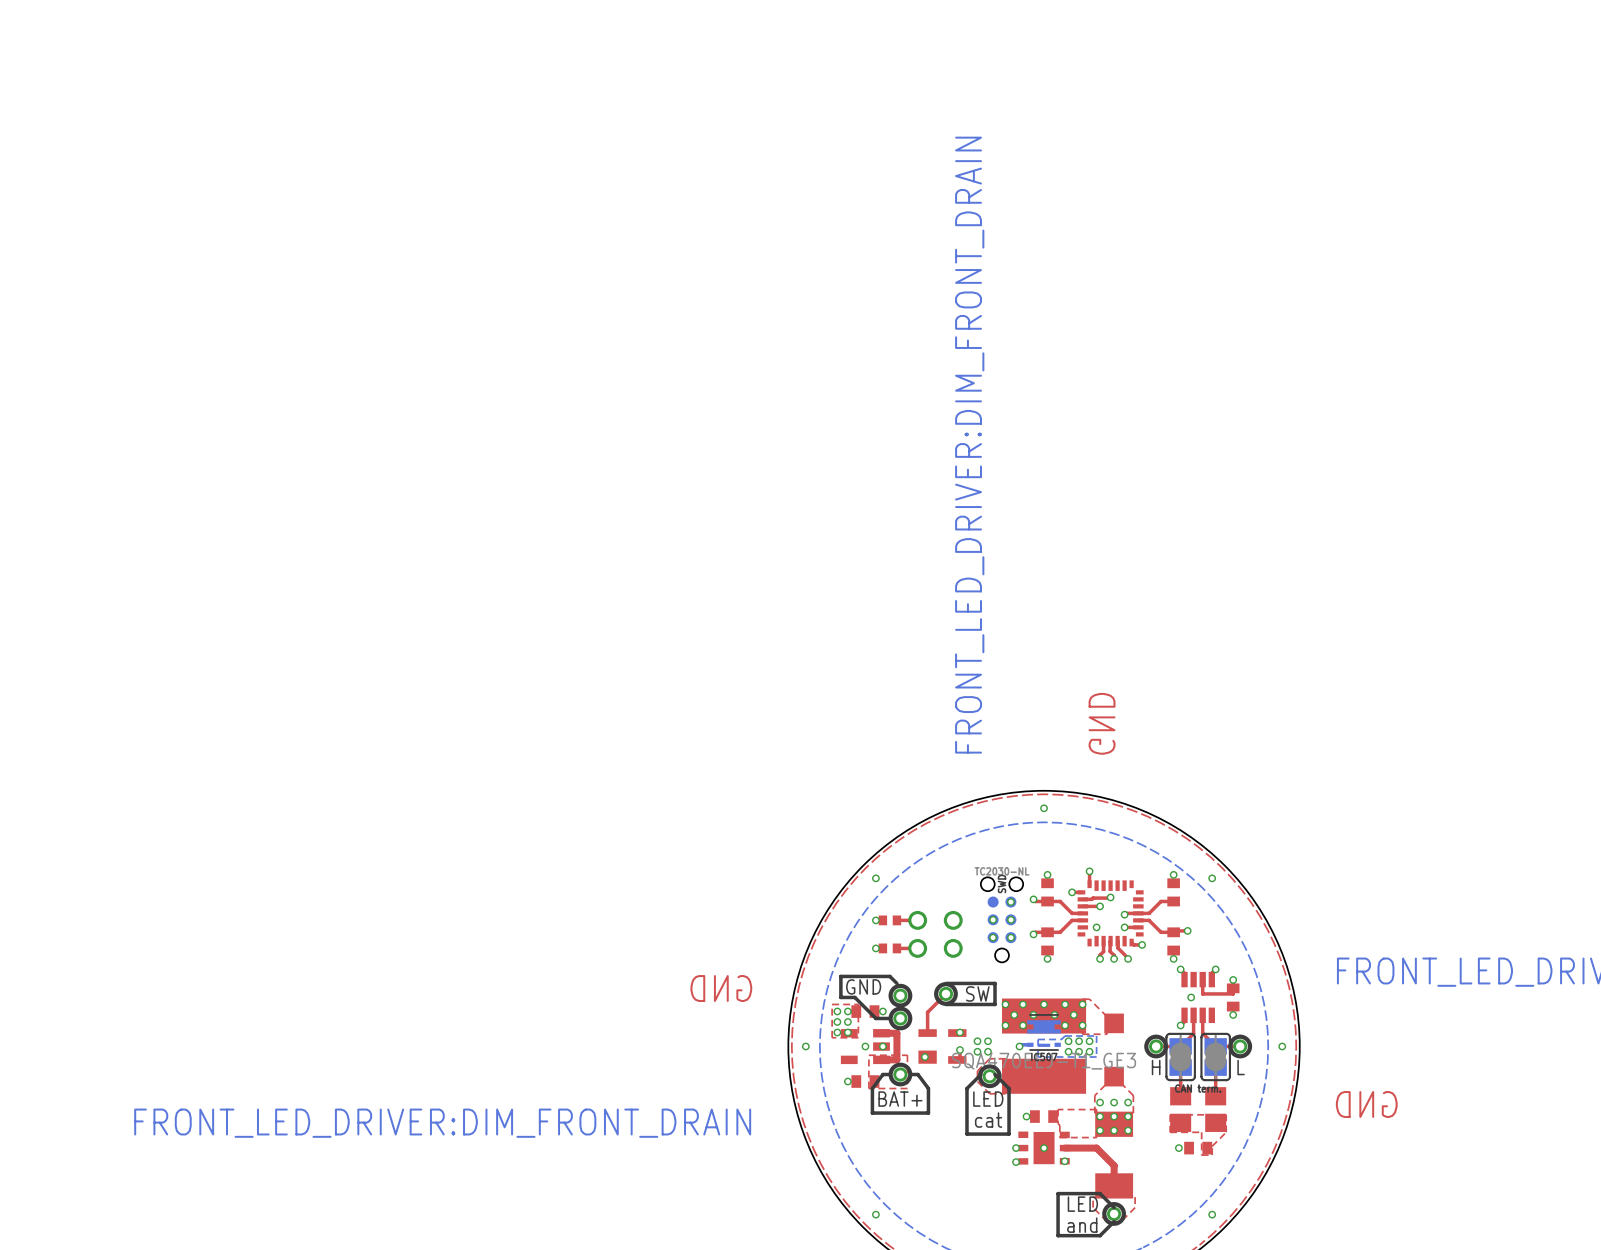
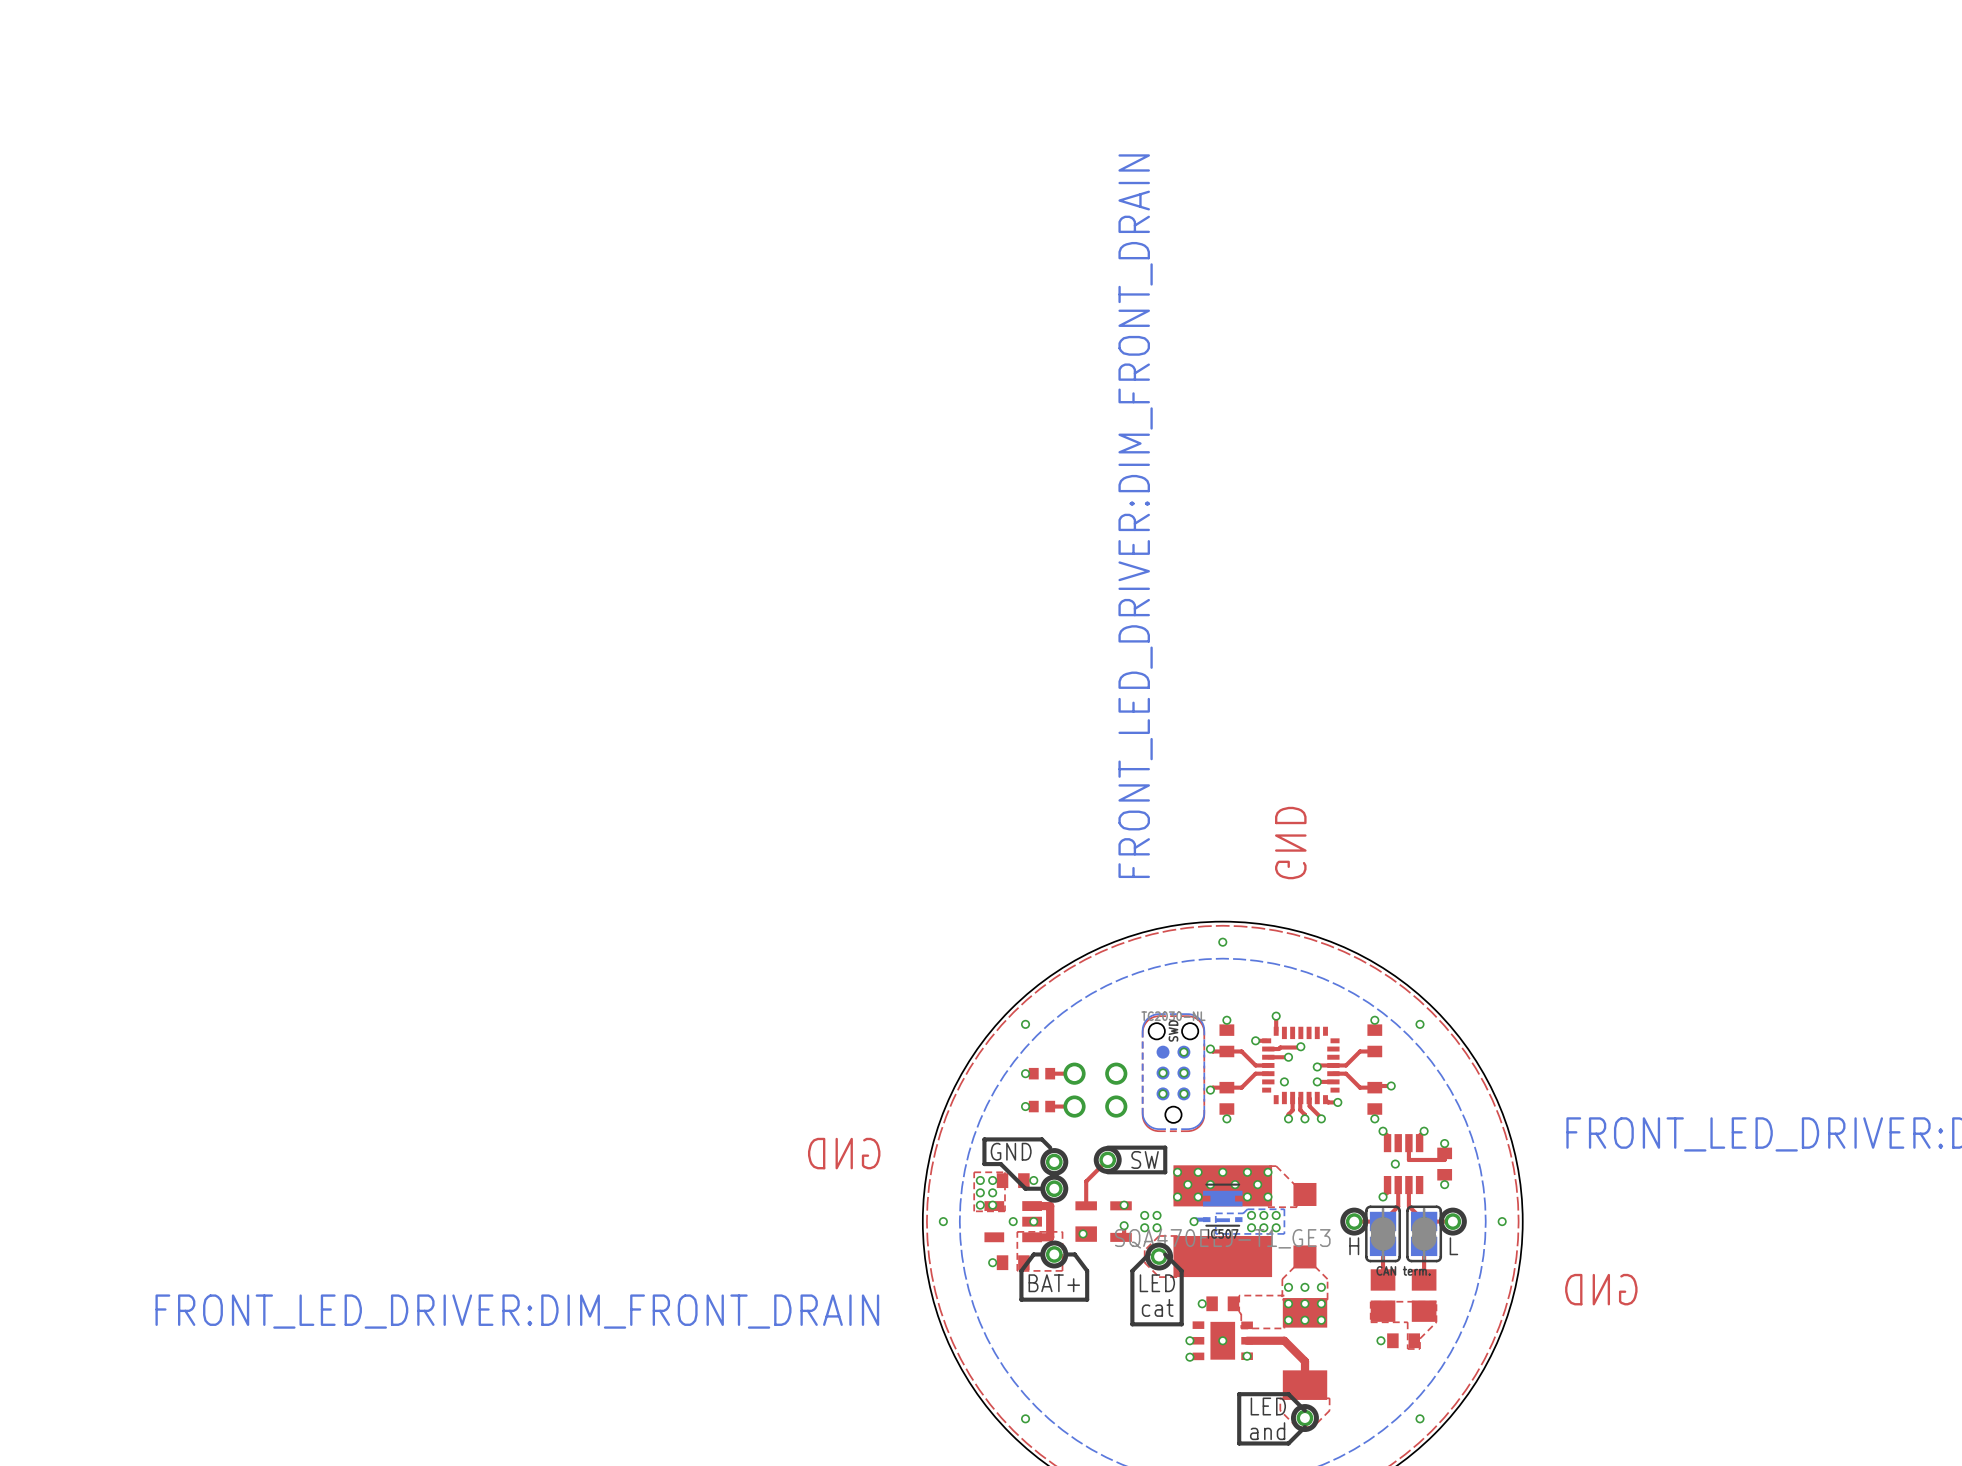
bottom zone outline: none -> (1189, 1014) (1199, 1018) (1204, 1028) (1203, 1116) (1199, 1124) (1192, 1128) (1154, 1128) (1147, 1124) (1142, 1114) (1143, 1026) (1147, 1018) (1154, 1014) (1189, 1014)
top zone outline: none -> (1187, 1016) (1154, 1016) (1147, 1020) (1143, 1028) (1142, 1116) (1147, 1126) (1154, 1130) (1192, 1130) (1199, 1126) (1203, 1119) (1204, 1030) (1199, 1020) (1187, 1016)

